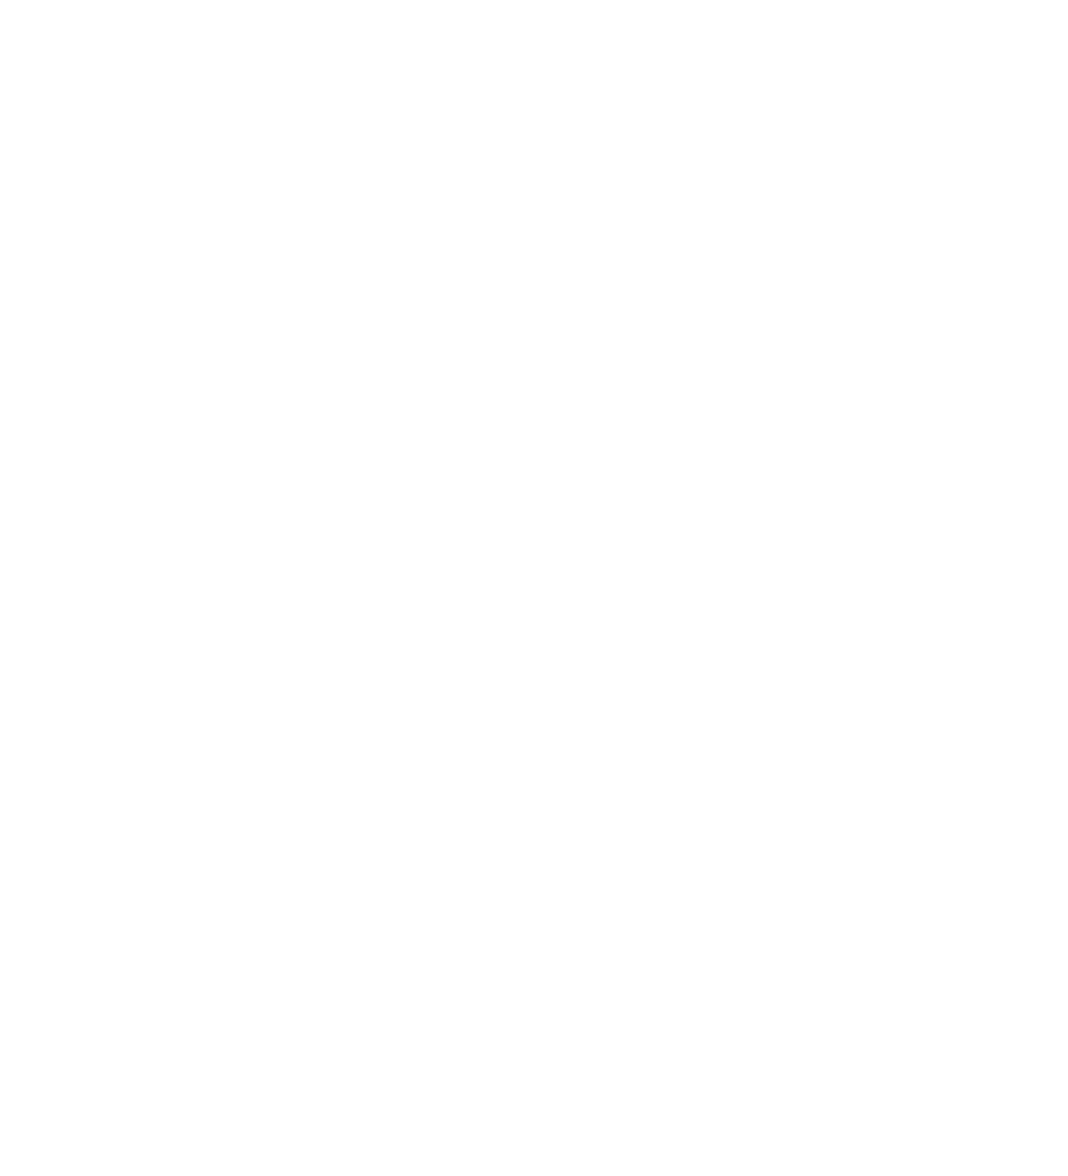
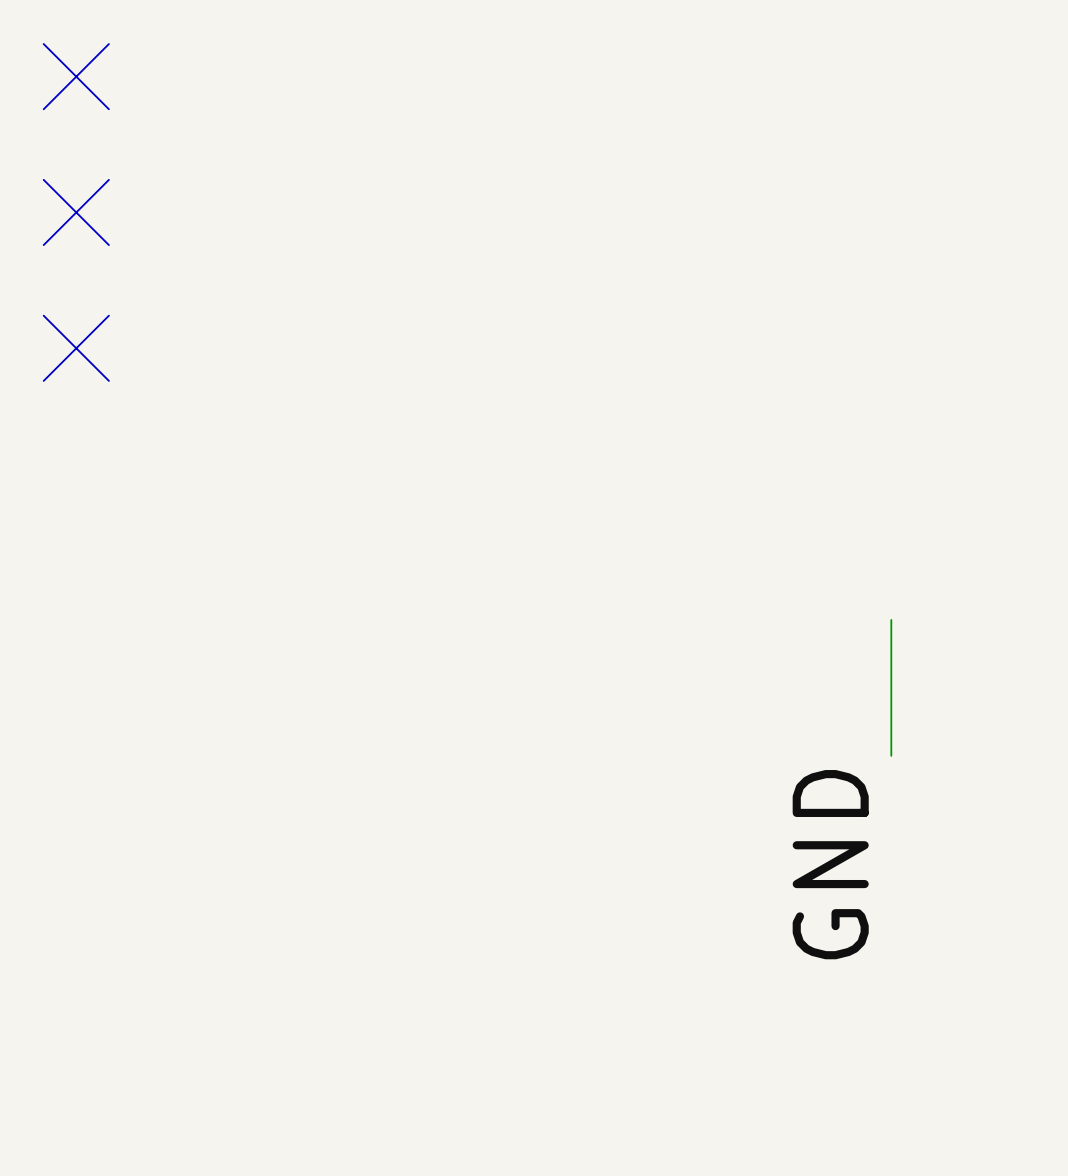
no-connect mark: none -> (76, 76)
no-connect mark: none -> (76, 212)
no-connect mark: none -> (76, 348)
wire: none -> (891, 619) (891, 755)
label: none -> GND (830, 864)

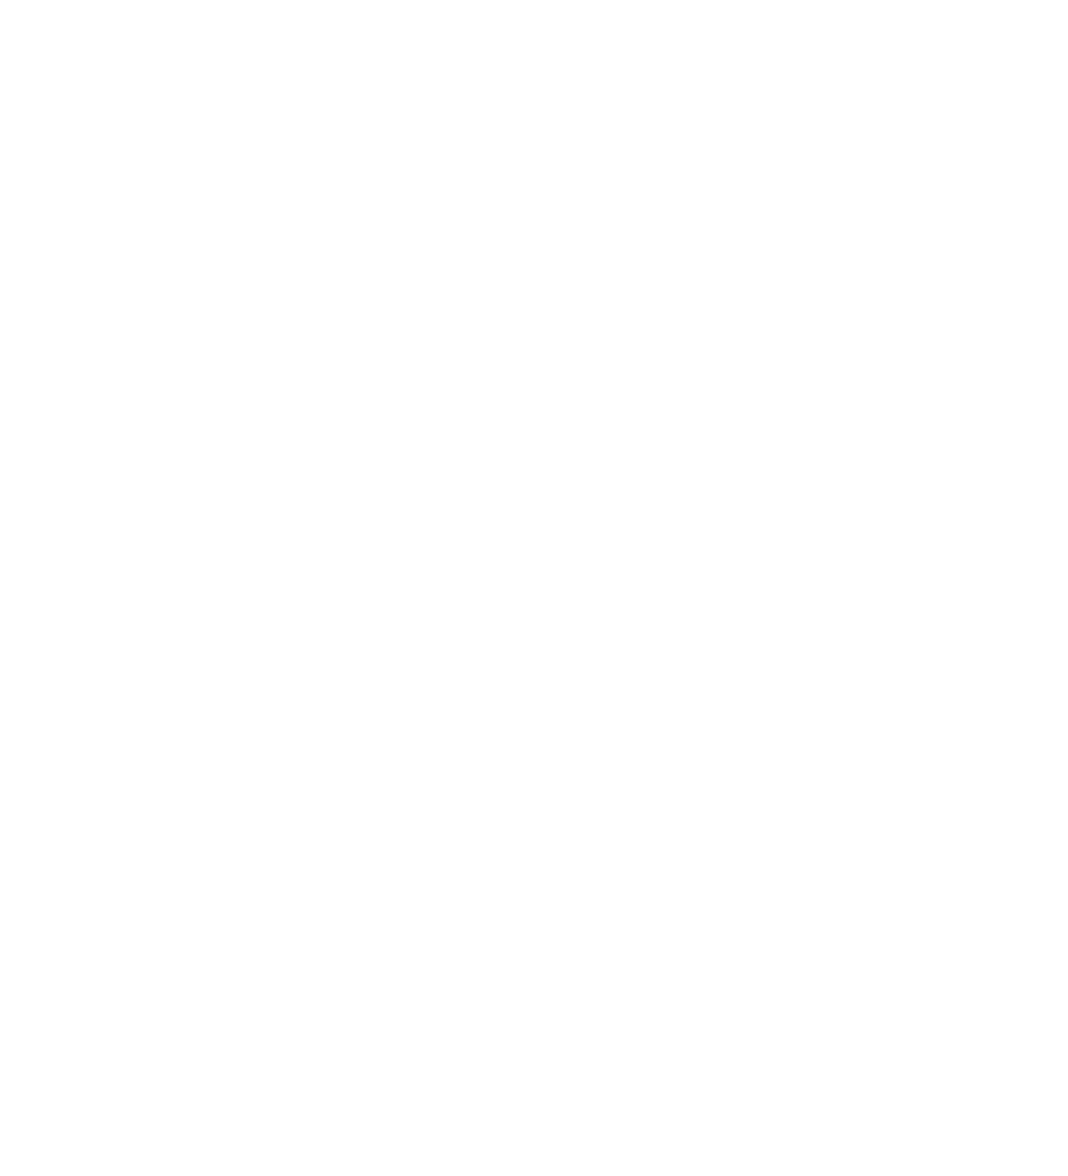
no-connect mark: (76, 76) -> none
no-connect mark: (76, 212) -> none
no-connect mark: (76, 348) -> none
wire: (891, 619) (891, 755) -> none
label: GND (830, 864) -> none

